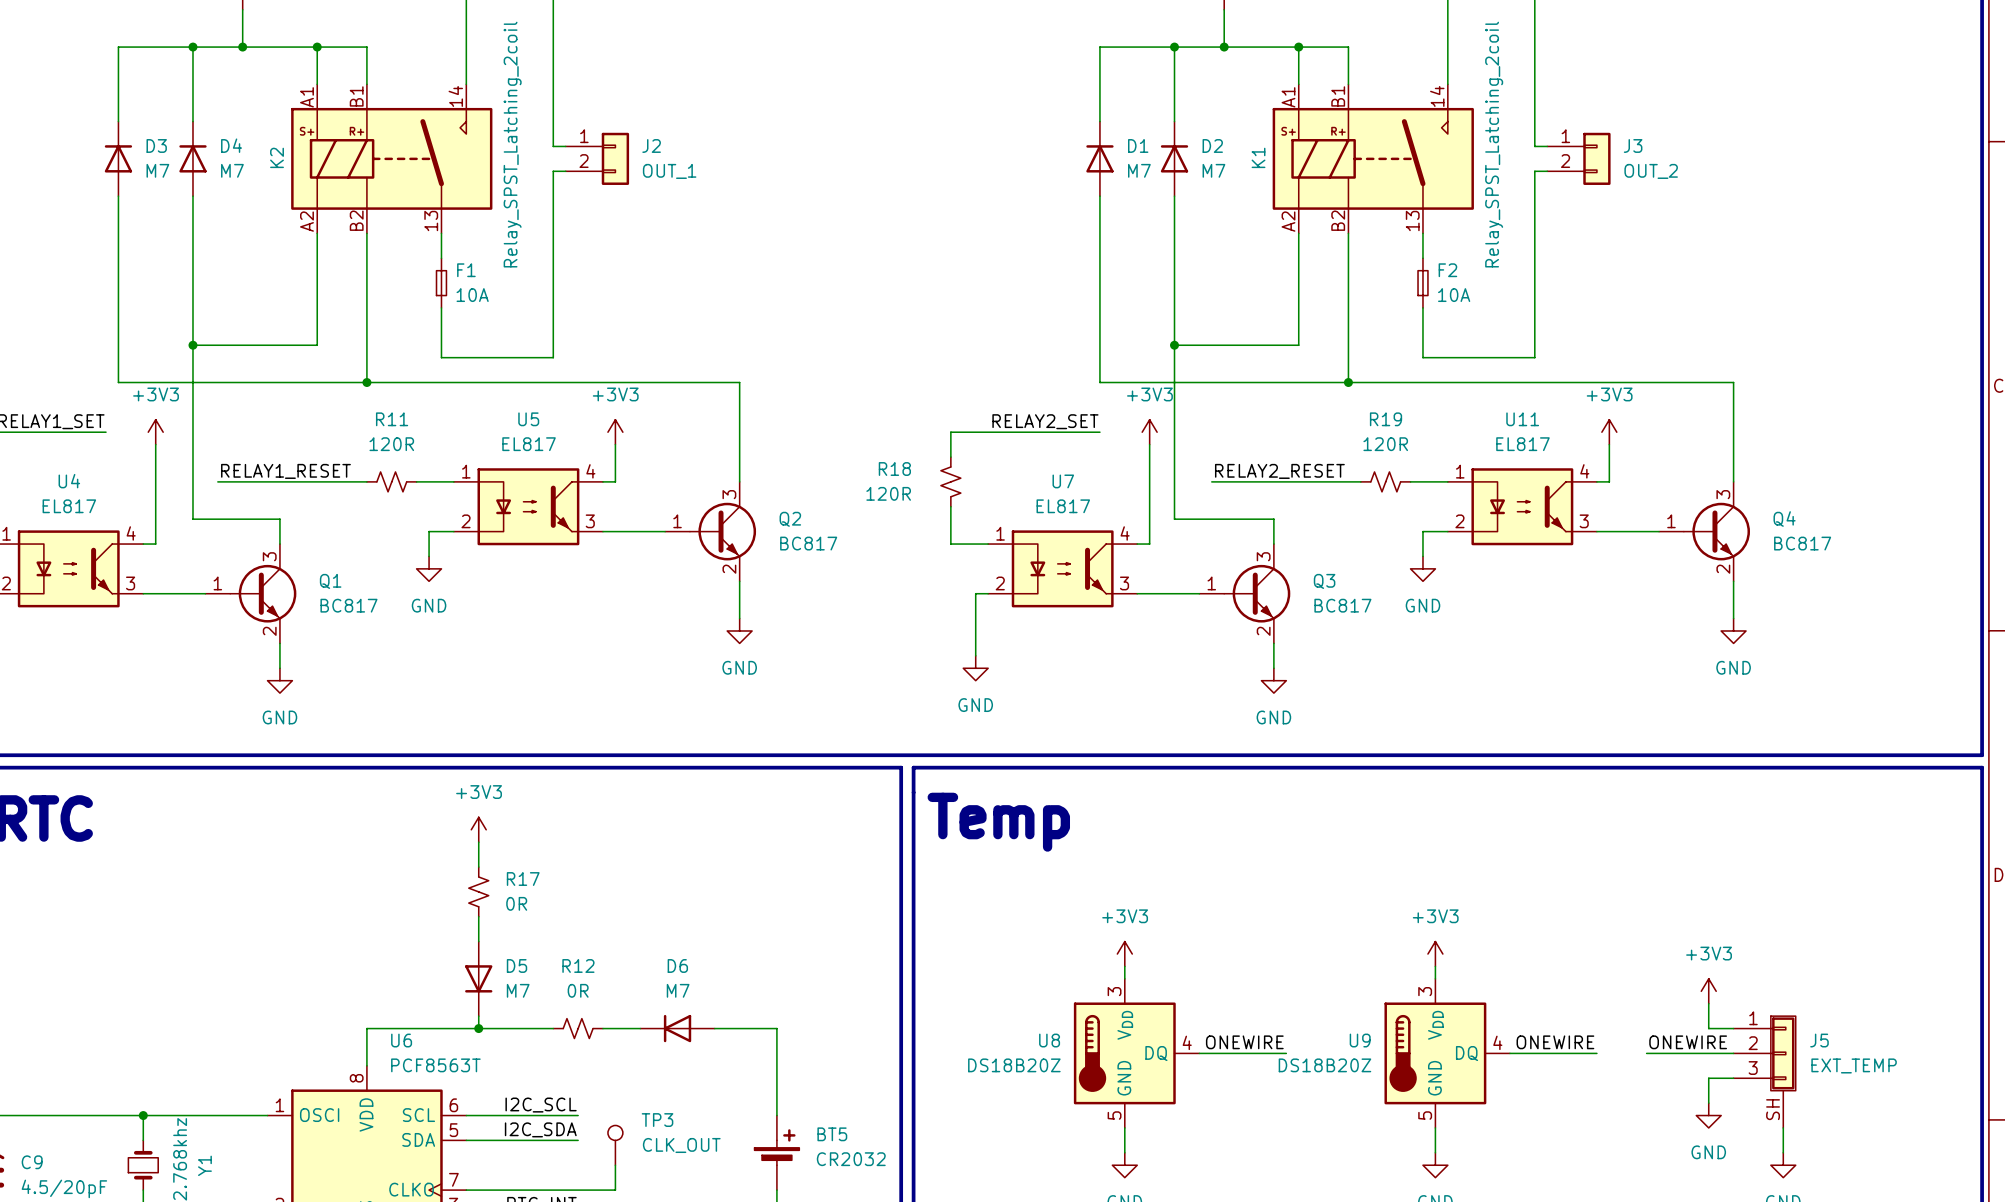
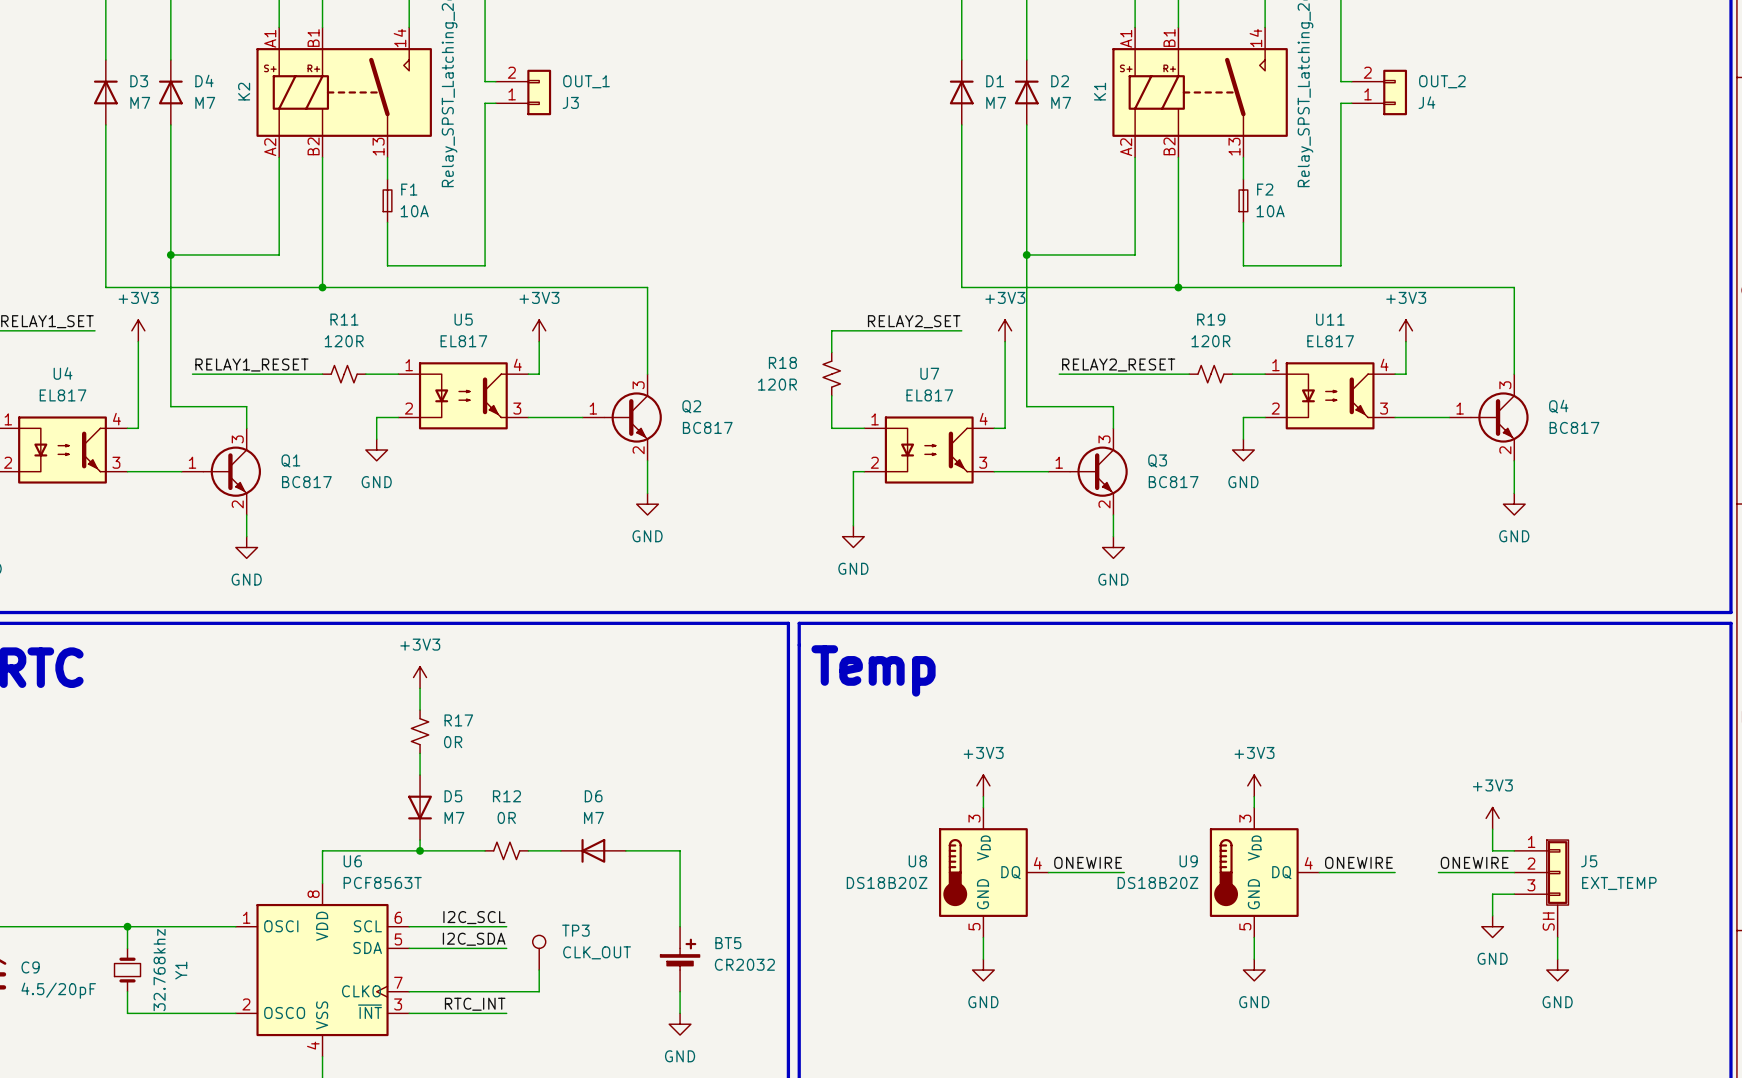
J2: OUT_1 (597, 158) -> none
J3 position: (1578, 158) -> (523, 92)
J4: none -> OUT_2 (1379, 92)
J3 flip: as is (1596, 158) -> up-down (539, 92)
J3 value: OUT_2 (1651, 171) -> OUT_1 (586, 81)

